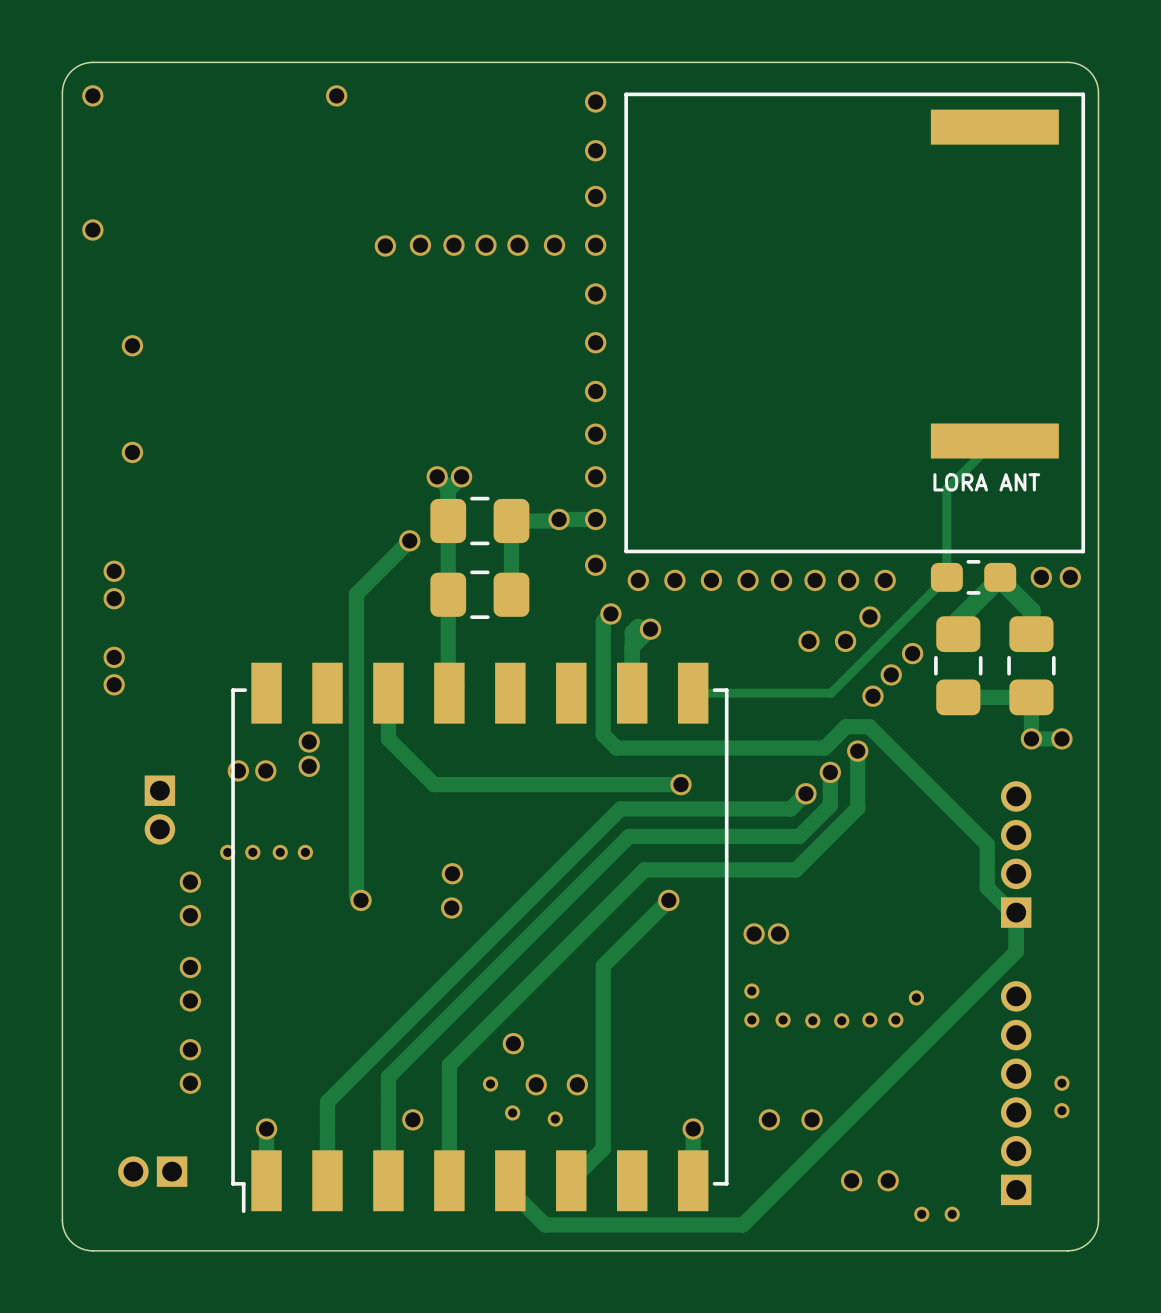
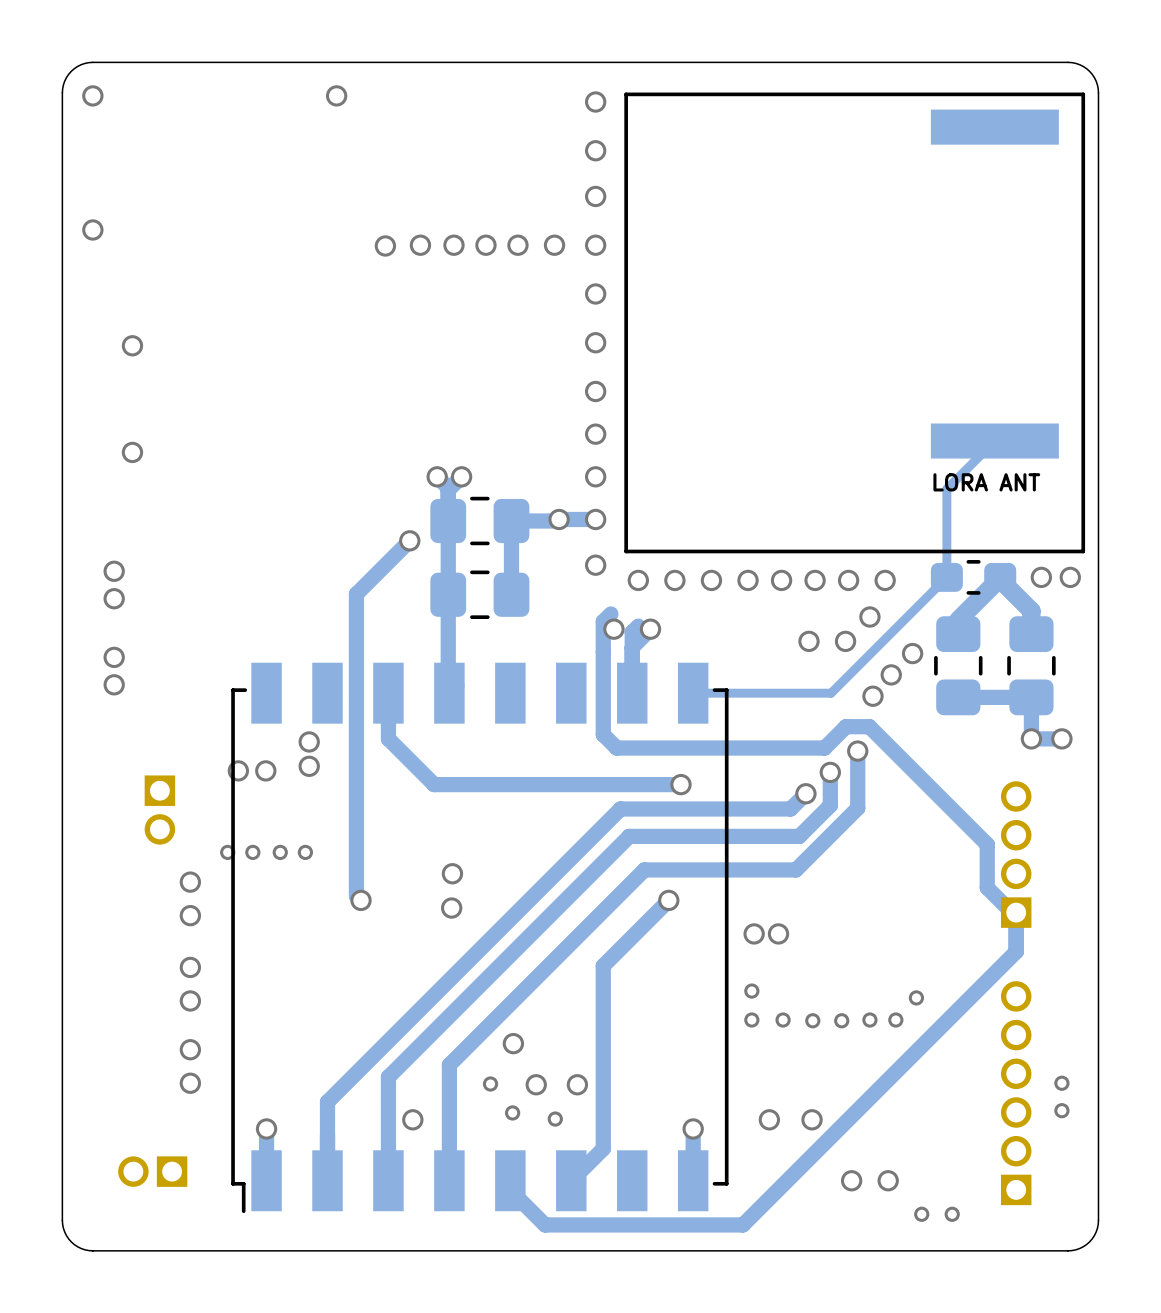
via position: (610, 613) -> (613, 629)

